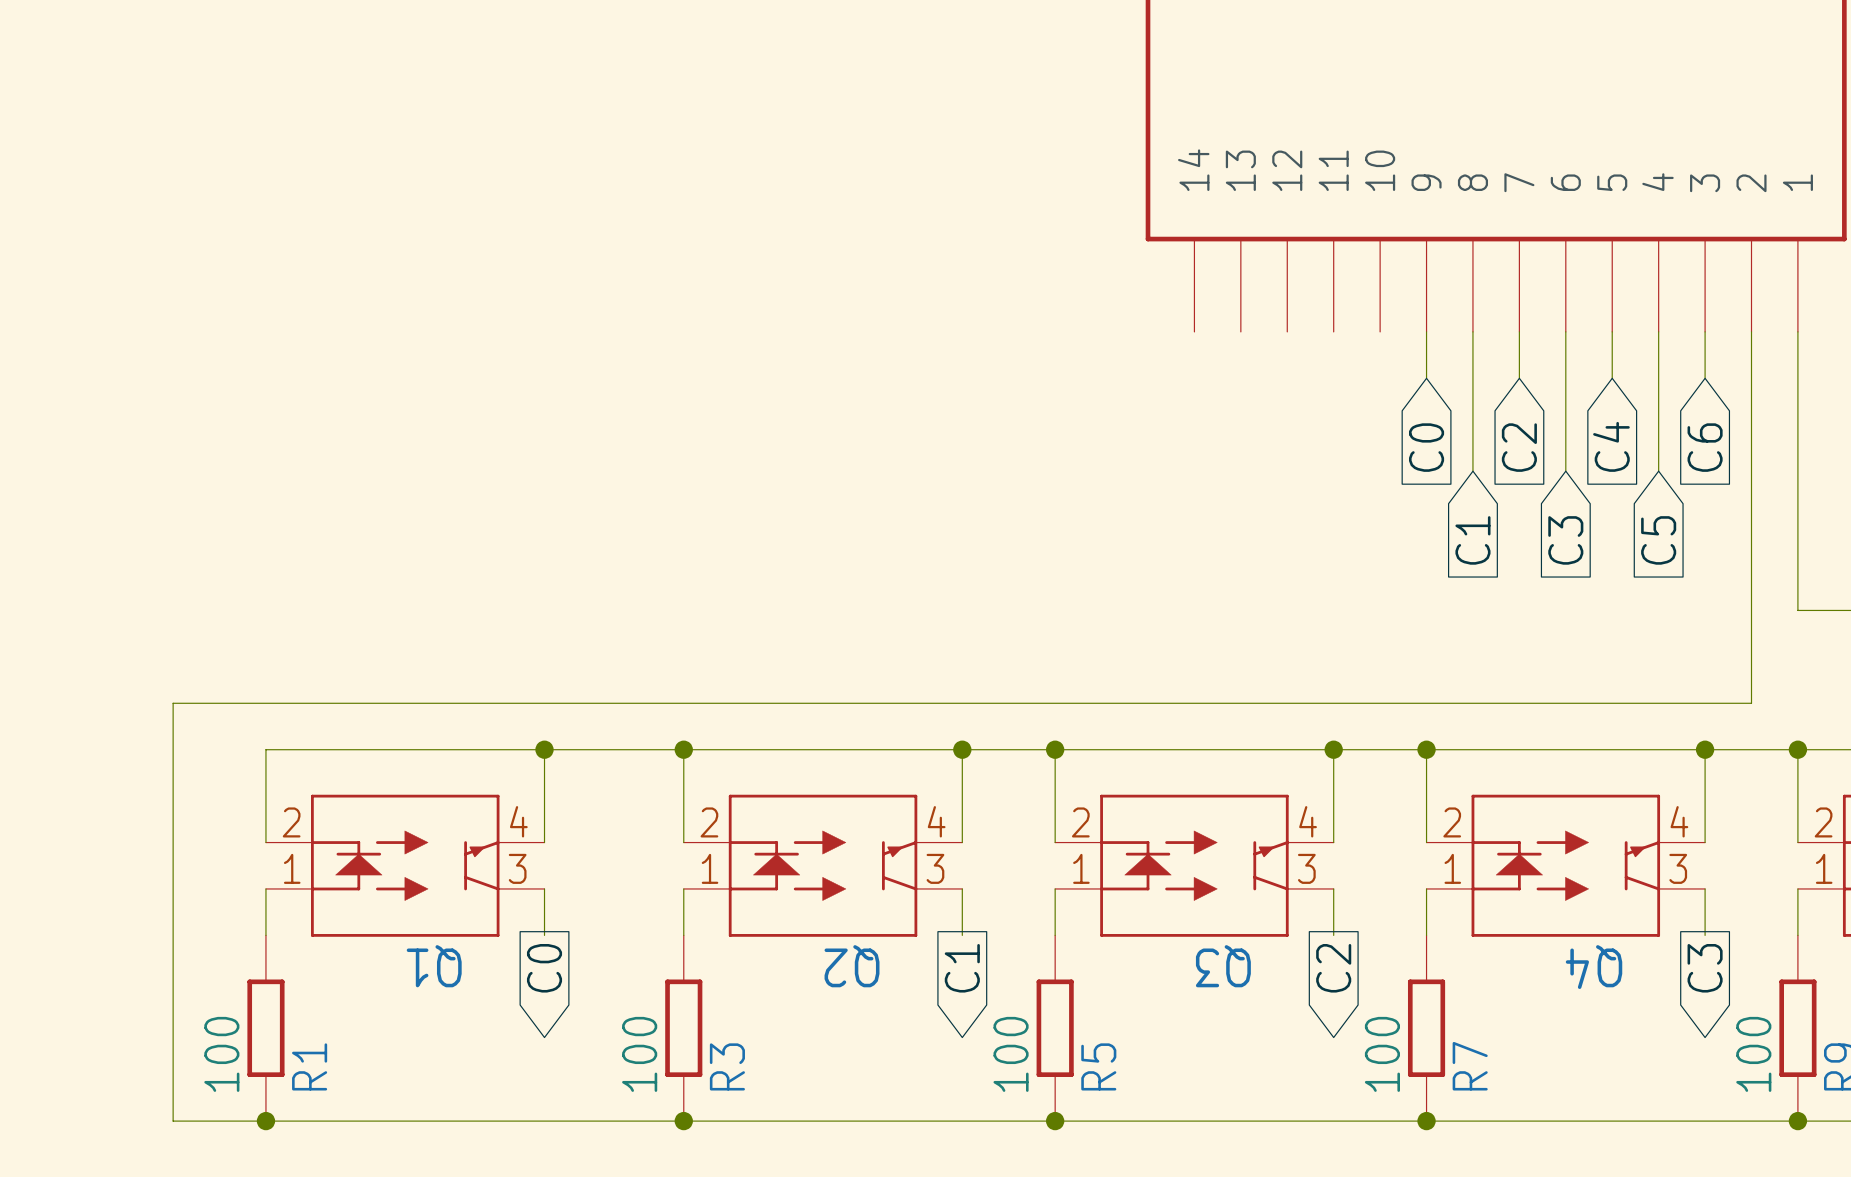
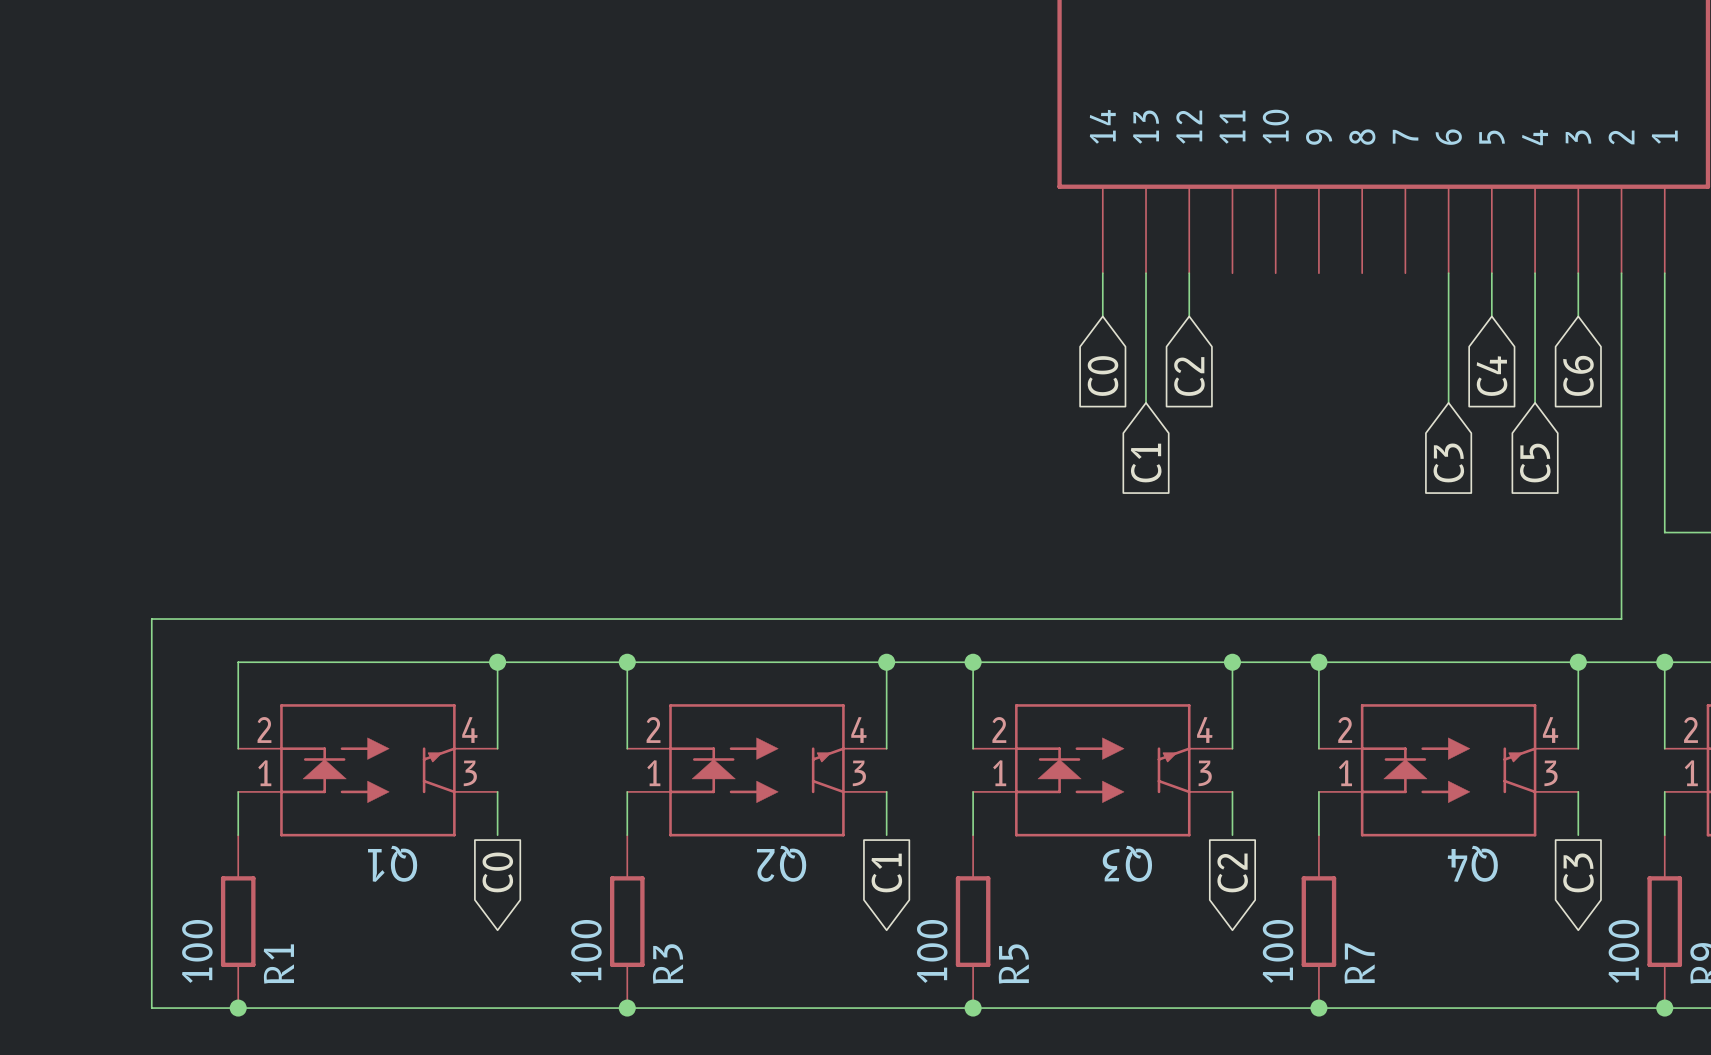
wire: (1426, 331) (1426, 378) -> (1189, 273) (1189, 316)
wire: (1472, 331) (1472, 471) -> (1146, 273) (1146, 402)
wire: (1519, 331) (1519, 378) -> (1102, 273) (1102, 316)
global label position: C0 (1426, 447) -> C0 (1102, 376)
global label position: C2 (1519, 447) -> C2 (1189, 376)
global label position: C1 (1472, 540) -> C1 (1146, 463)

